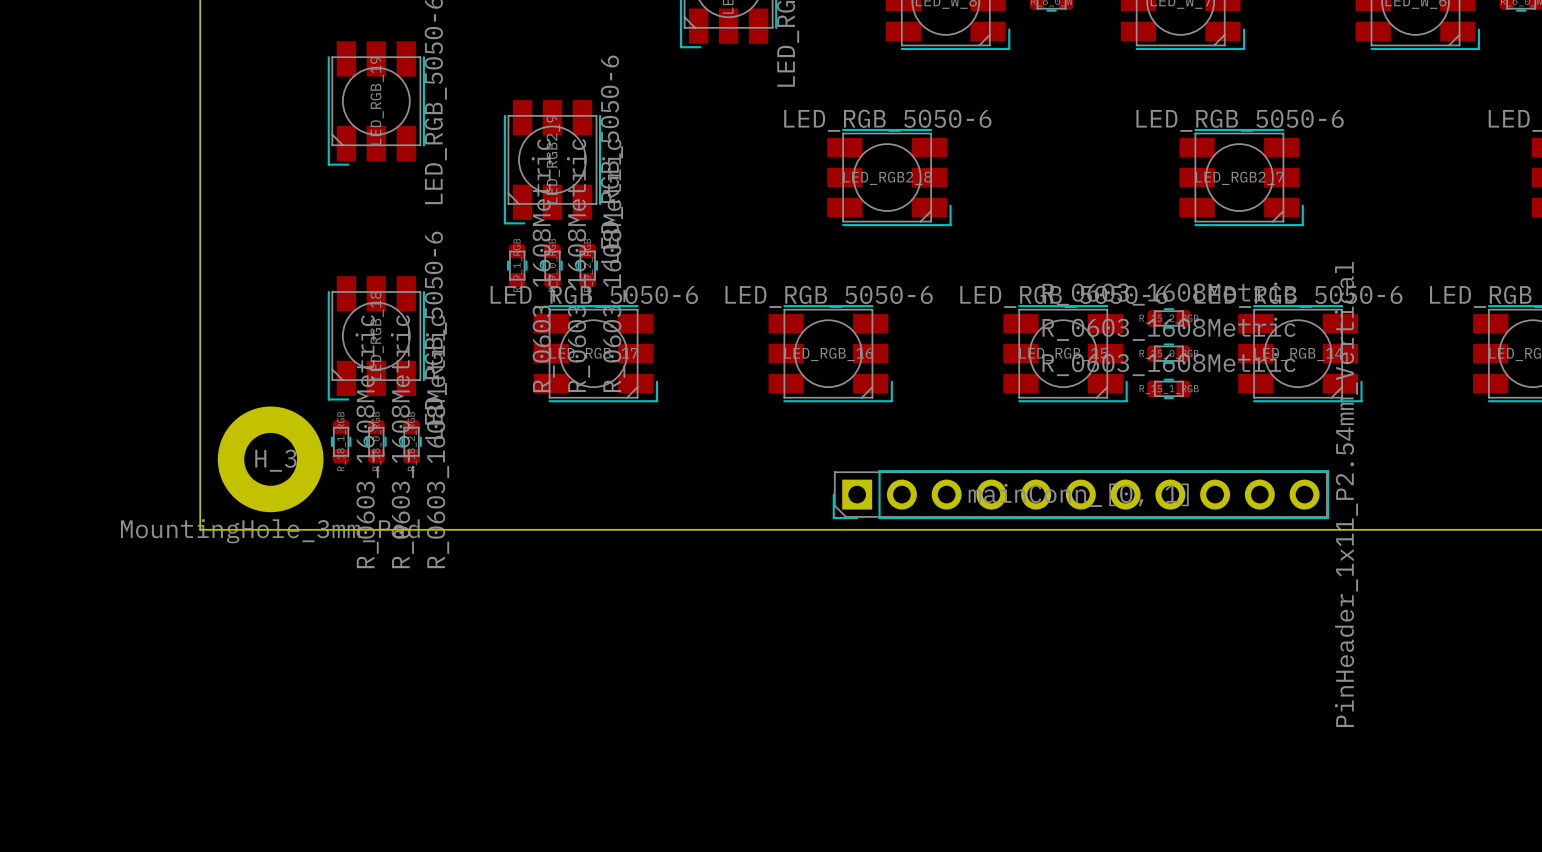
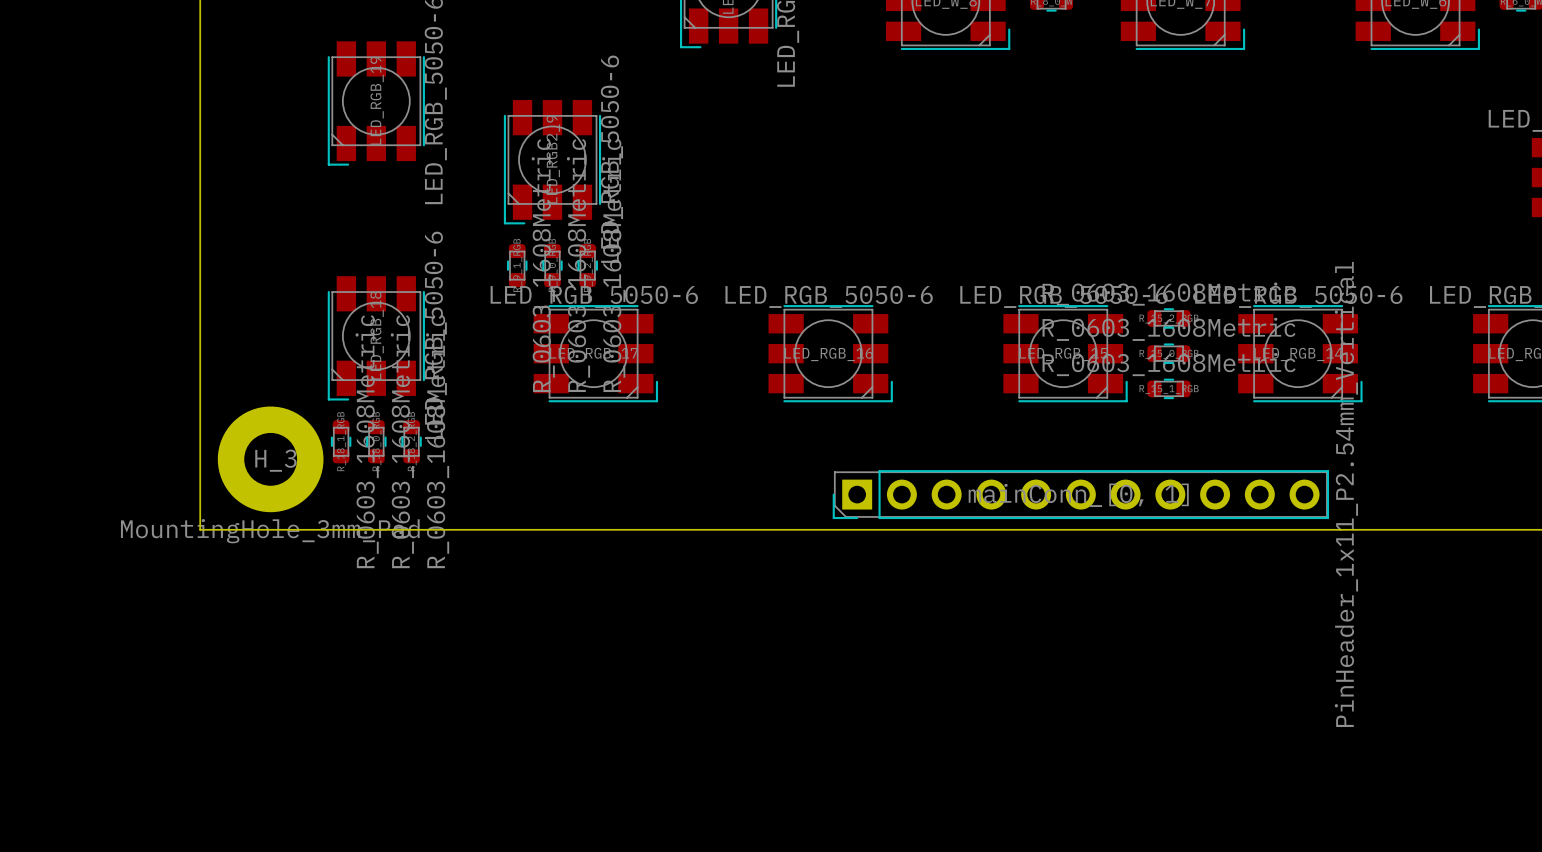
LED_RGB2_8: LED_RGB_5050-6 (889, 177) -> none
LED_RGB2_7: LED_RGB_5050-6 (1241, 177) -> none

